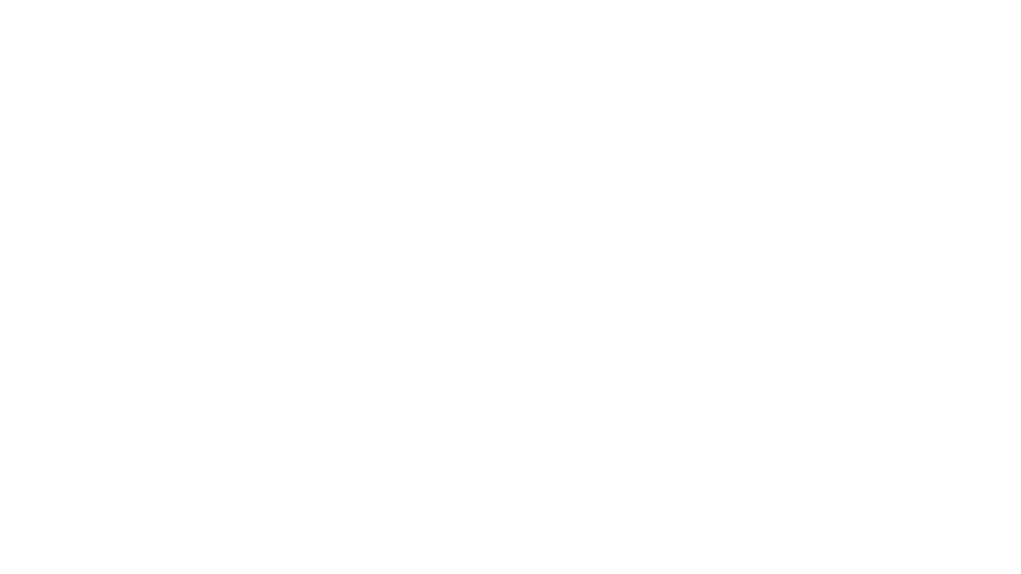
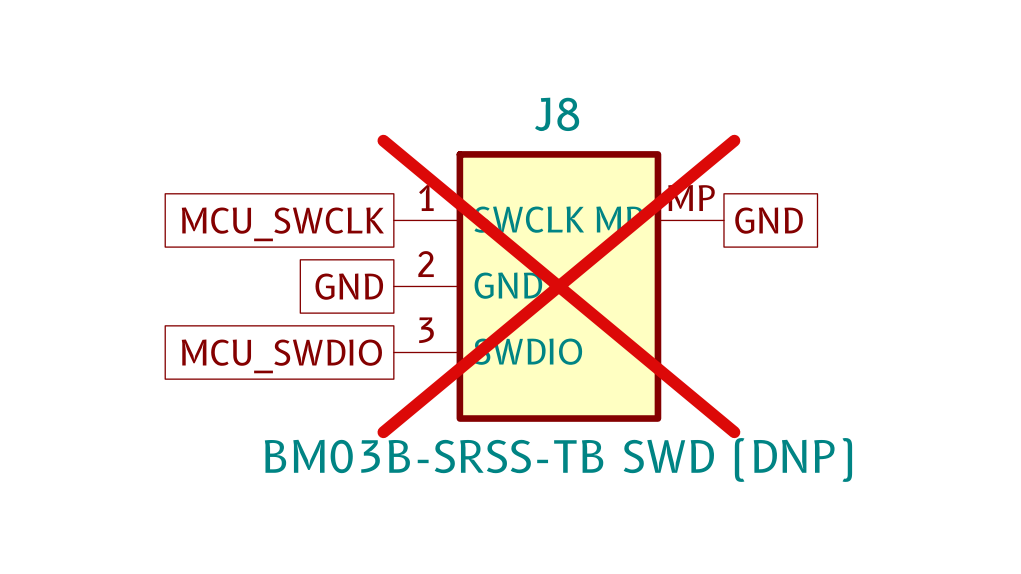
global label: none -> GND (769, 220)
global label: none -> MCU_SWCLK (282, 224)
global label: none -> GND (349, 286)
J8: none -> BM03B-SRSS-TB SWD (DNP) (558, 286)
global label: none -> MCU_SWDIO (281, 356)

